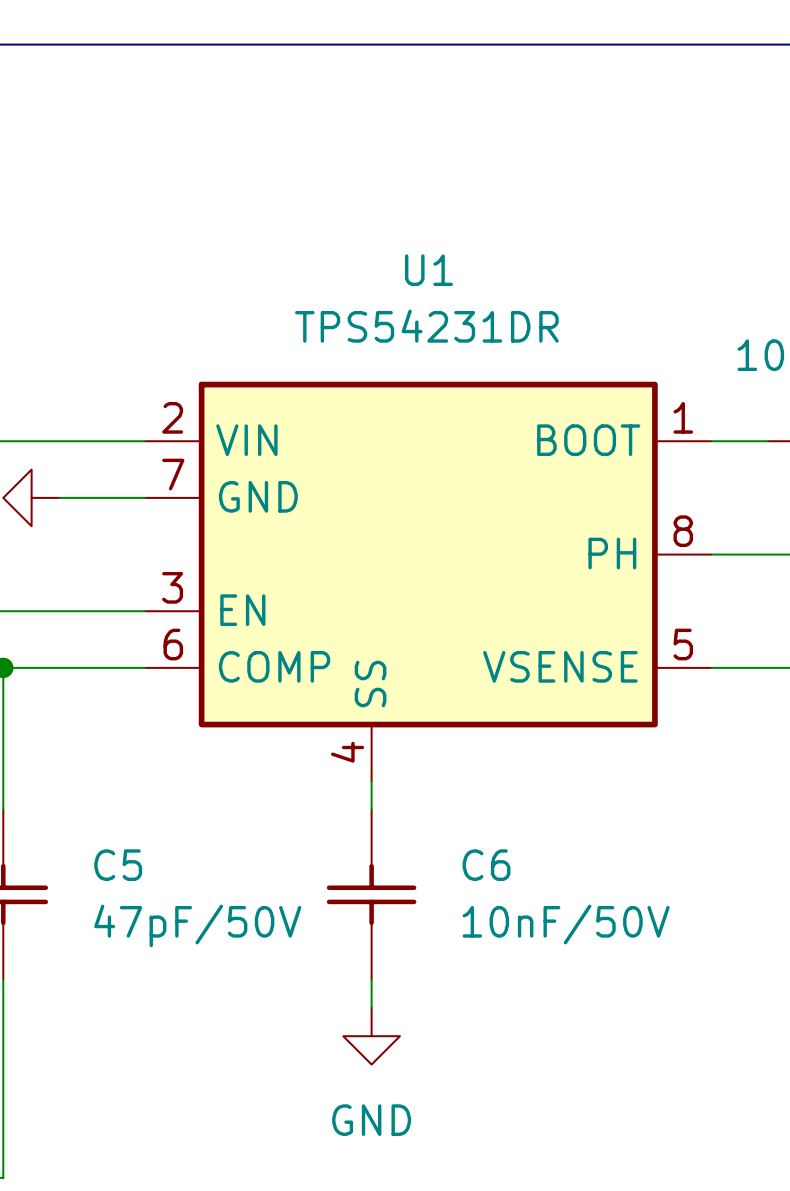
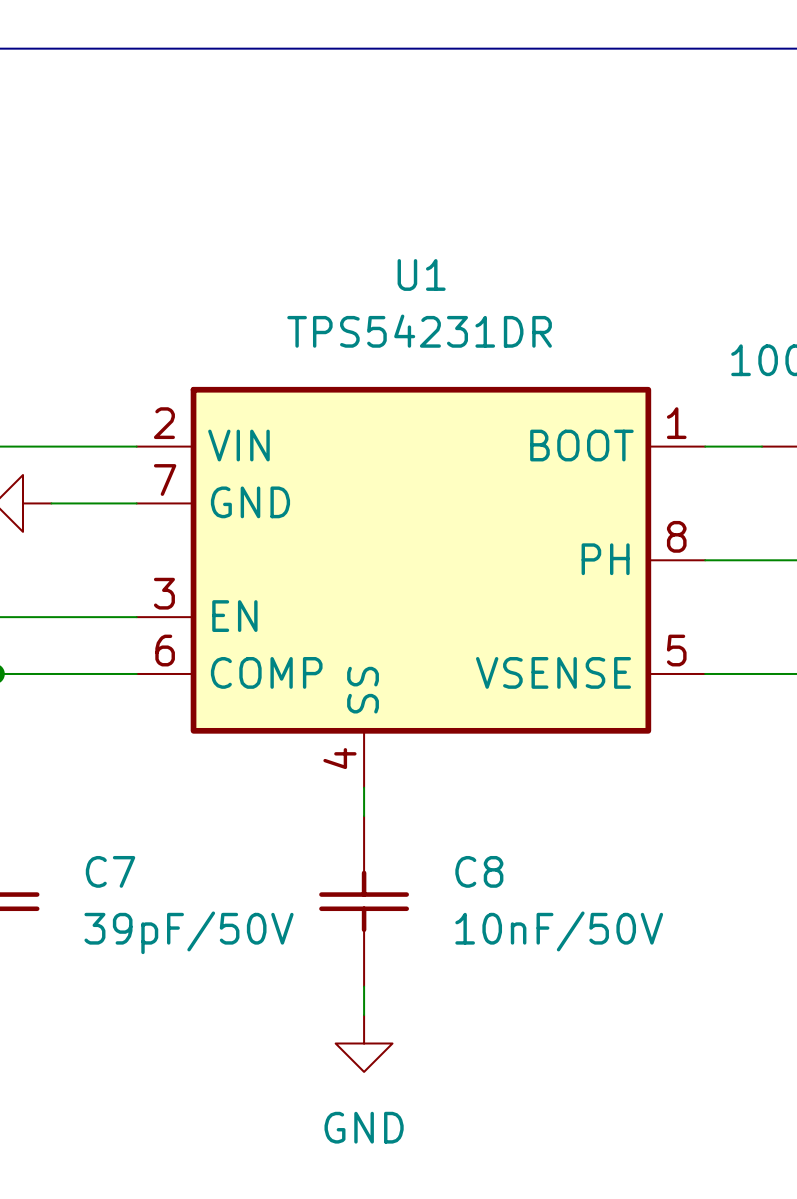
C5 name: C5 (118, 865) -> C7 (110, 871)
C6 name: C6 (486, 865) -> C8 (479, 871)
C5 value: 47pF/50V (197, 925) -> 39pF/50V (189, 932)

